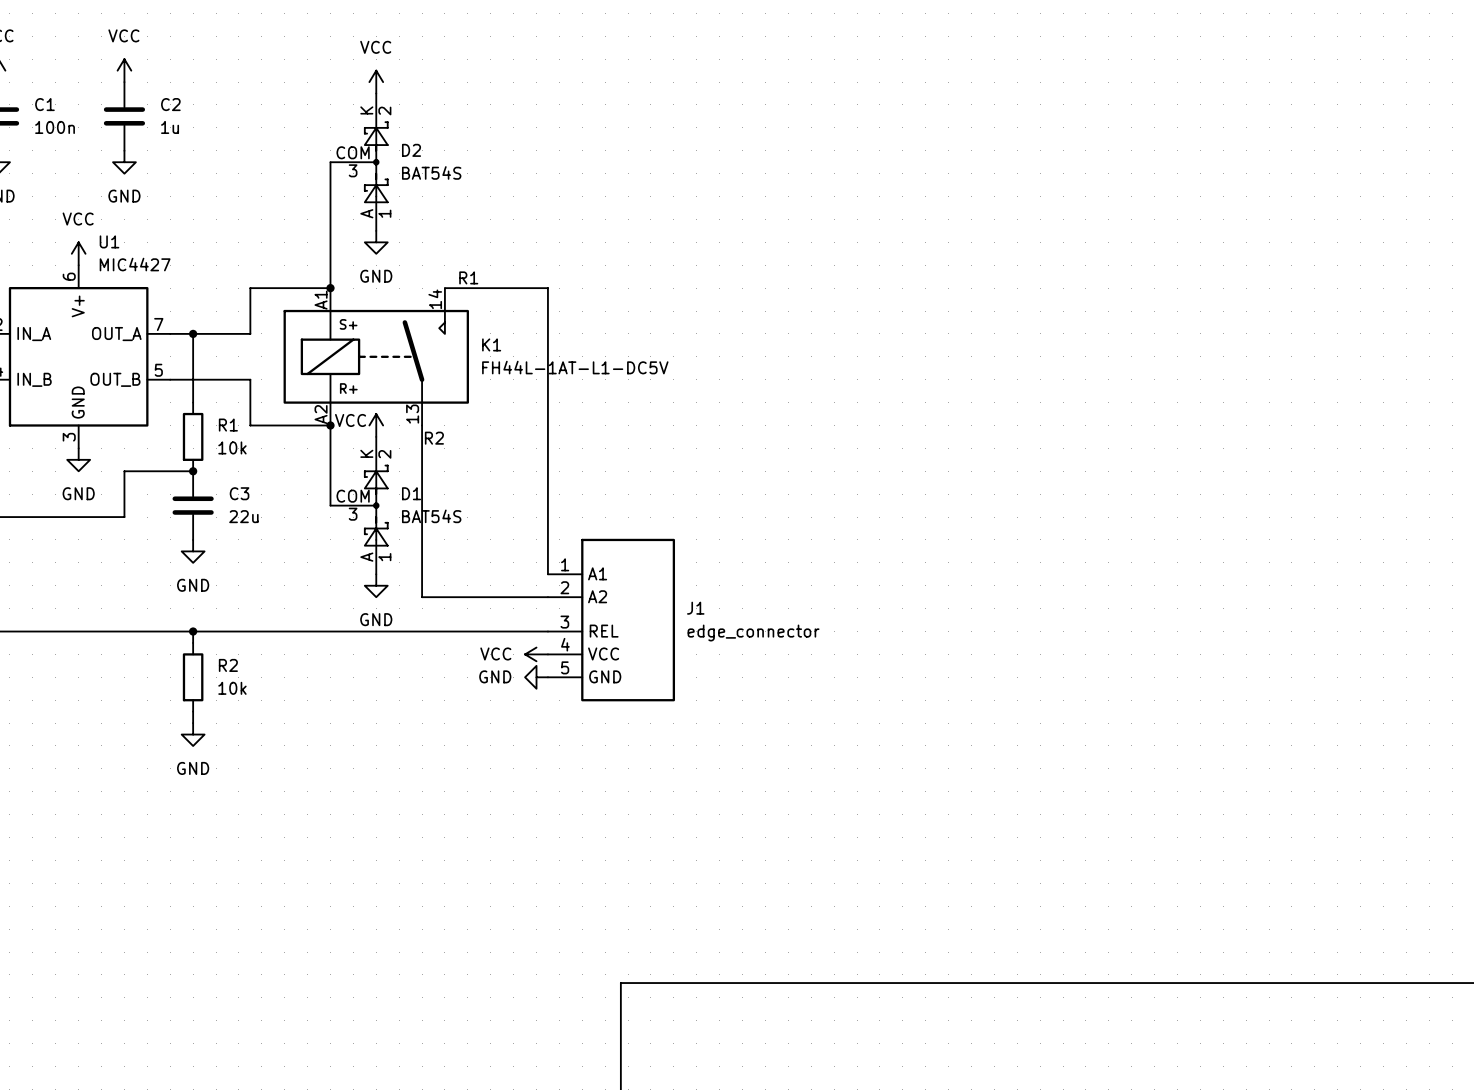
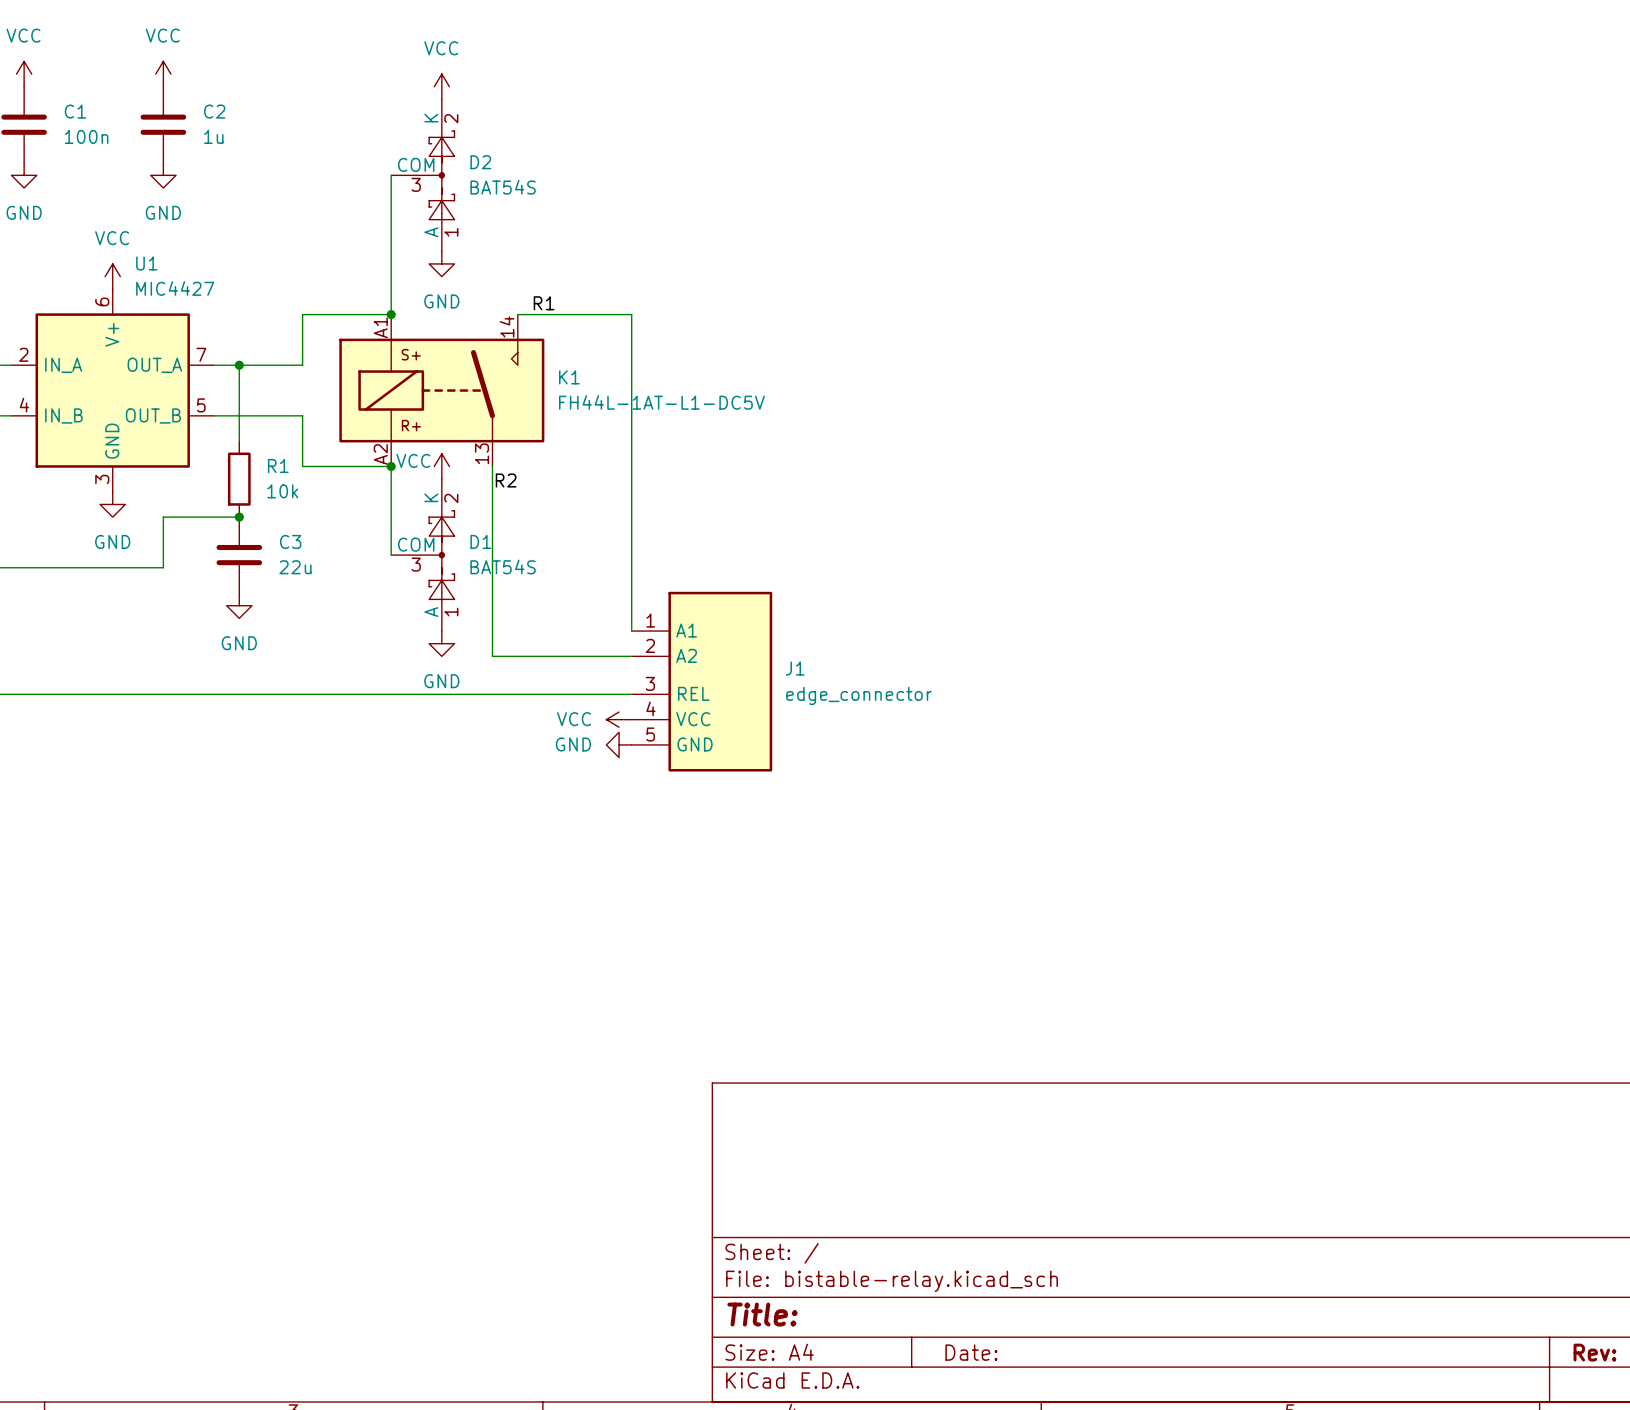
wire: (193, 631) (193, 642) -> none
junction: (193, 631) -> none
R2: 10k (193, 677) -> none
wire: (193, 711) (193, 723) -> none
power symbol: GND (193, 734) -> none

